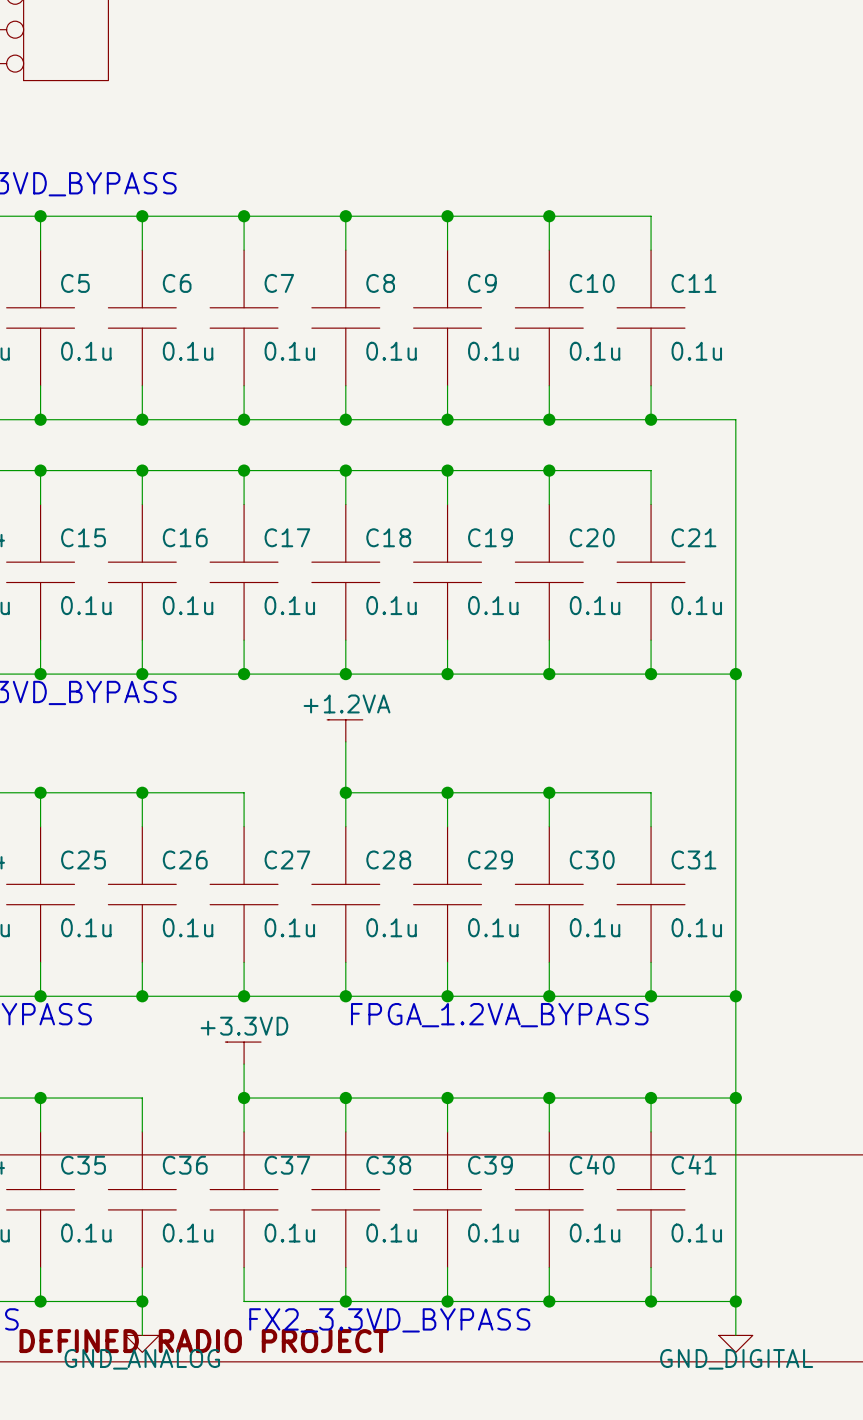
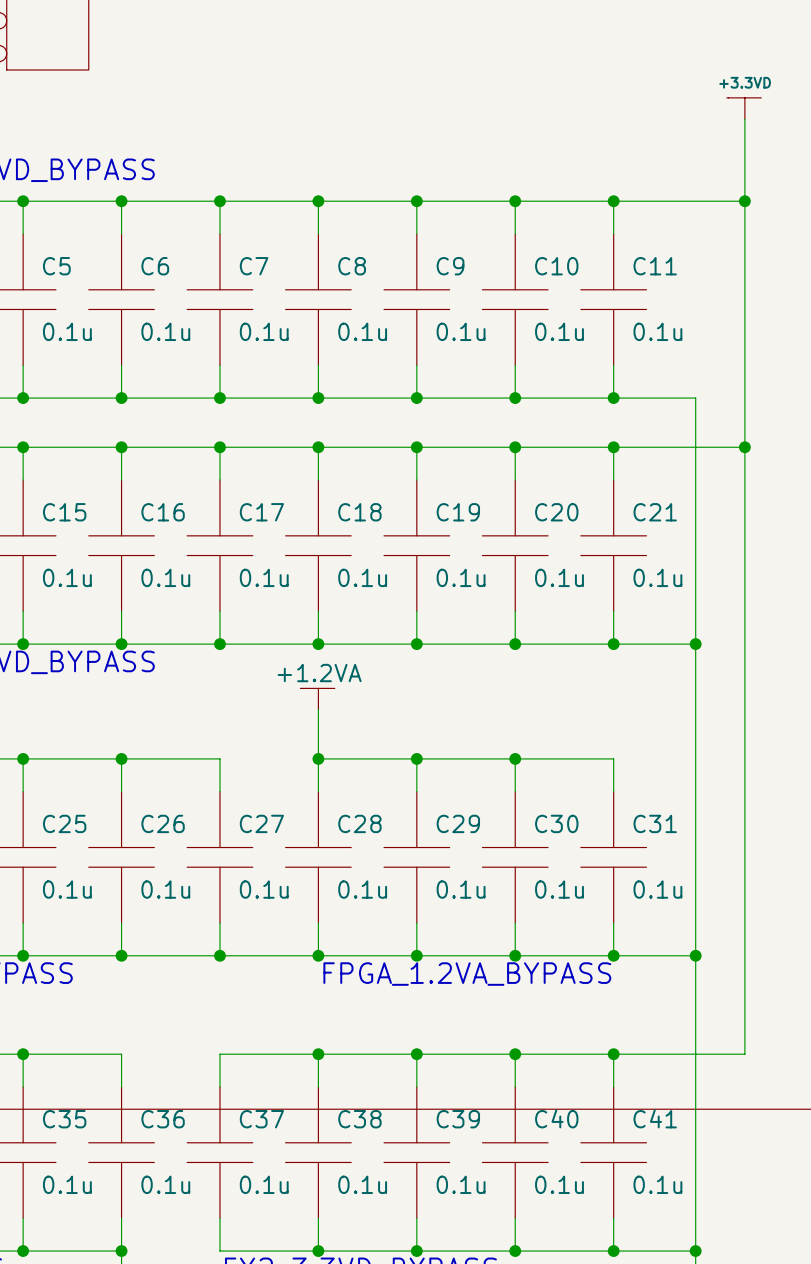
power symbol: none -> +3.3VD (744, 108)
wire: none -> (744, 119) (744, 1054) (695, 1054)
wire: none -> (613, 201) (744, 201)
junction: none -> (613, 201)
junction: none -> (744, 201)
wire: none -> (613, 447) (744, 447)
junction: none -> (613, 447)
junction: none -> (744, 447)
power symbol: +3.3VD (243, 1053) -> none
wire: (244, 1064) (244, 1098) -> none
junction: (244, 1098) -> none
junction: (735, 1098) -> none

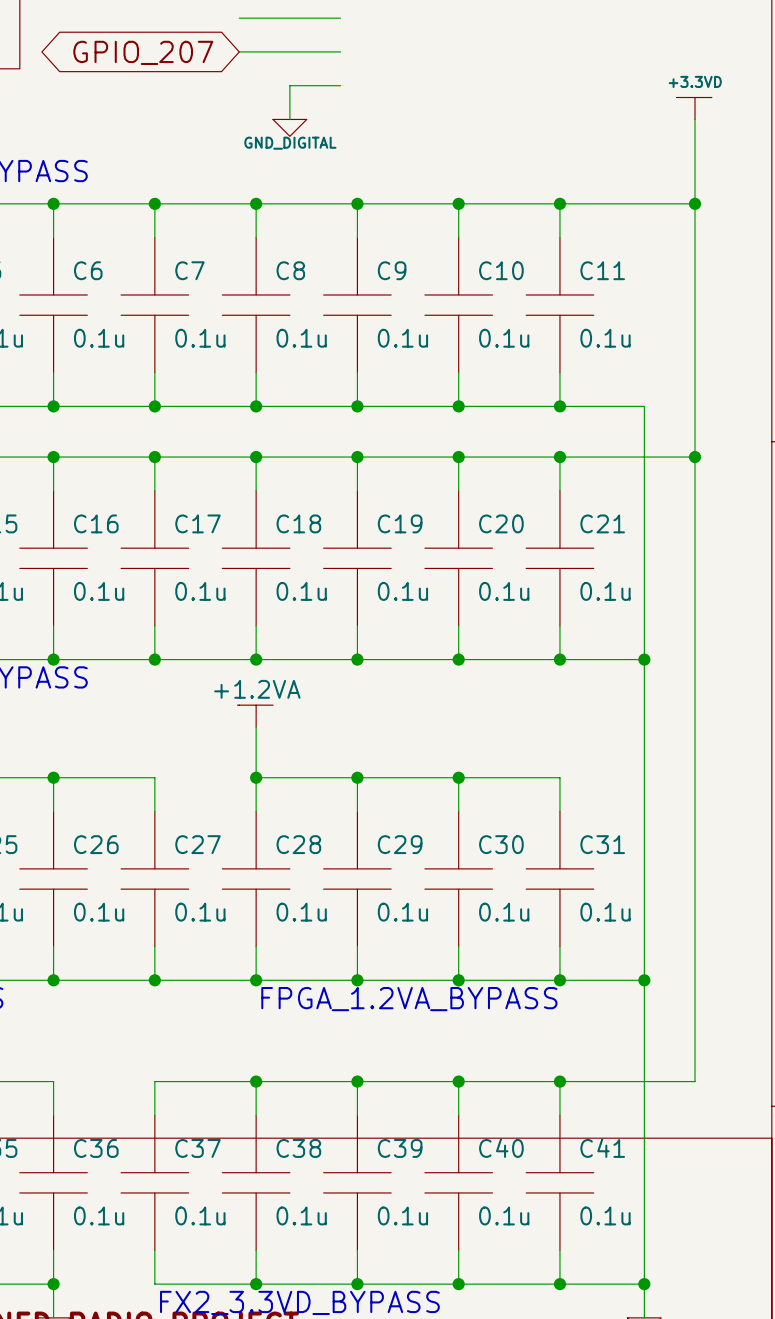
wire: none -> (239, 18) (340, 18)
wire: none -> (239, 51) (340, 51)
global label: none -> GPIO_207 (143, 52)
wire: none -> (340, 85) (289, 85) (289, 119)
power symbol: none -> GND_DIGITAL (289, 127)

